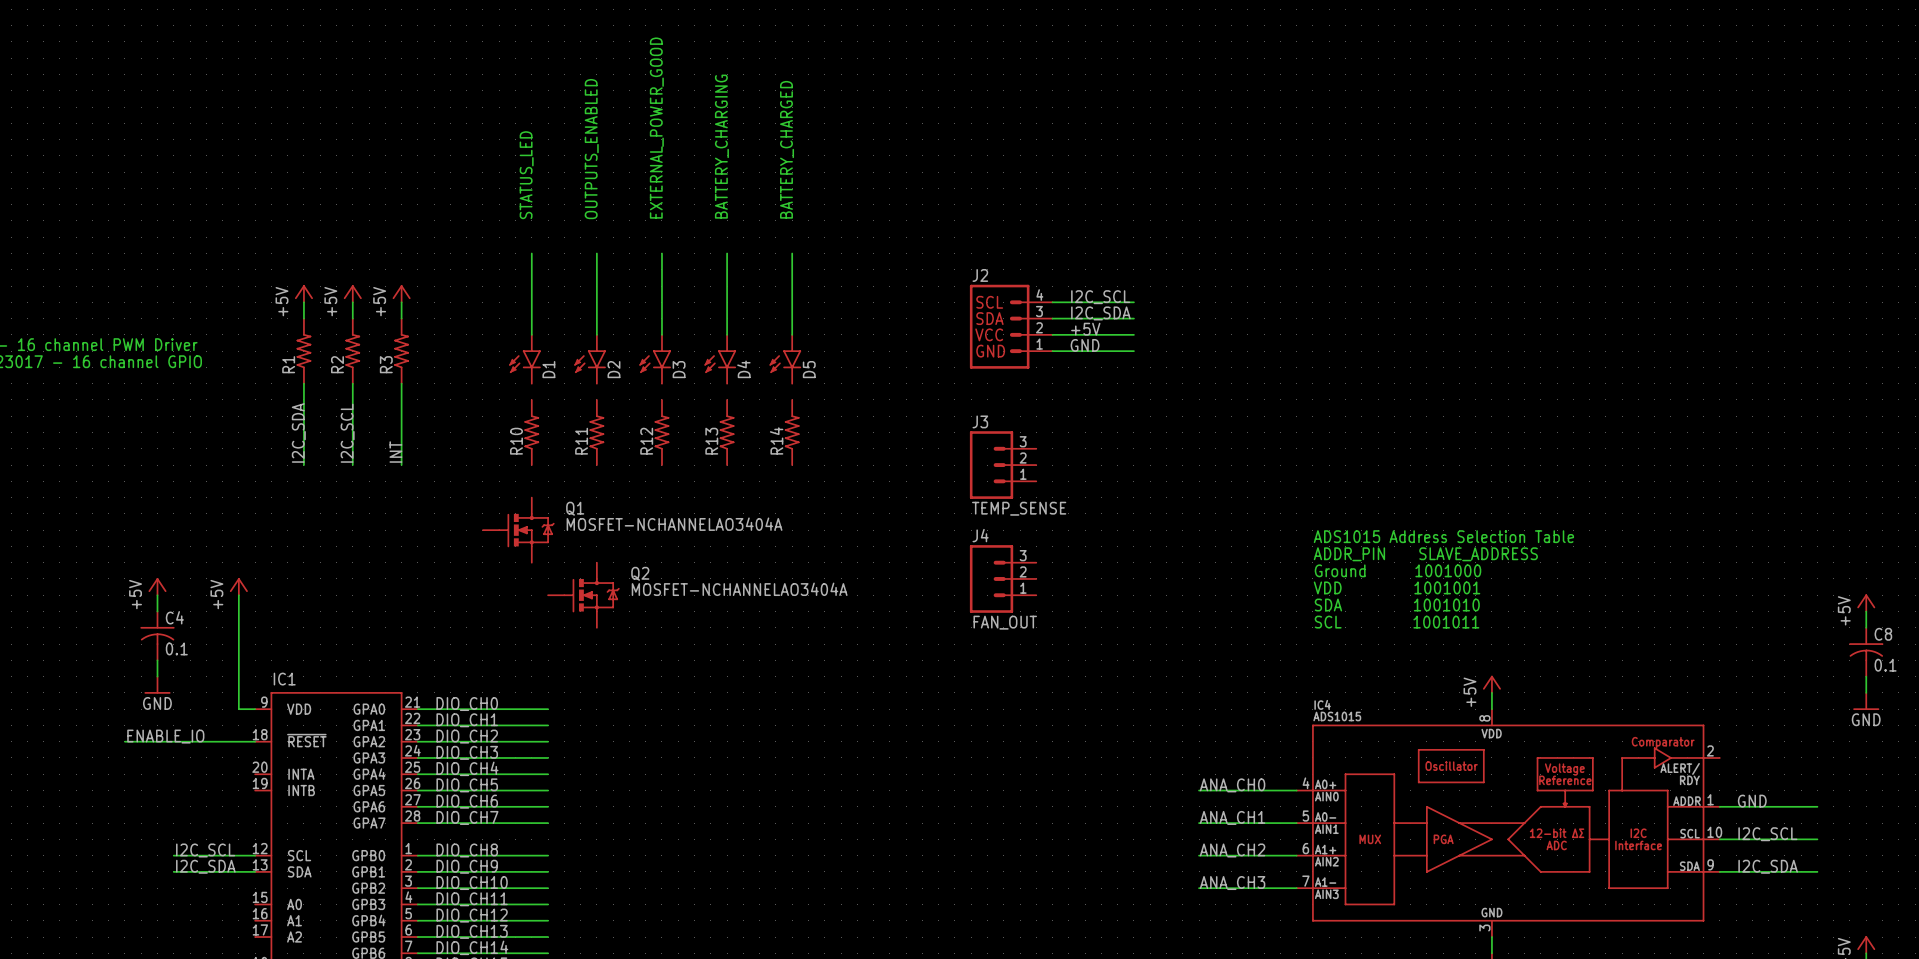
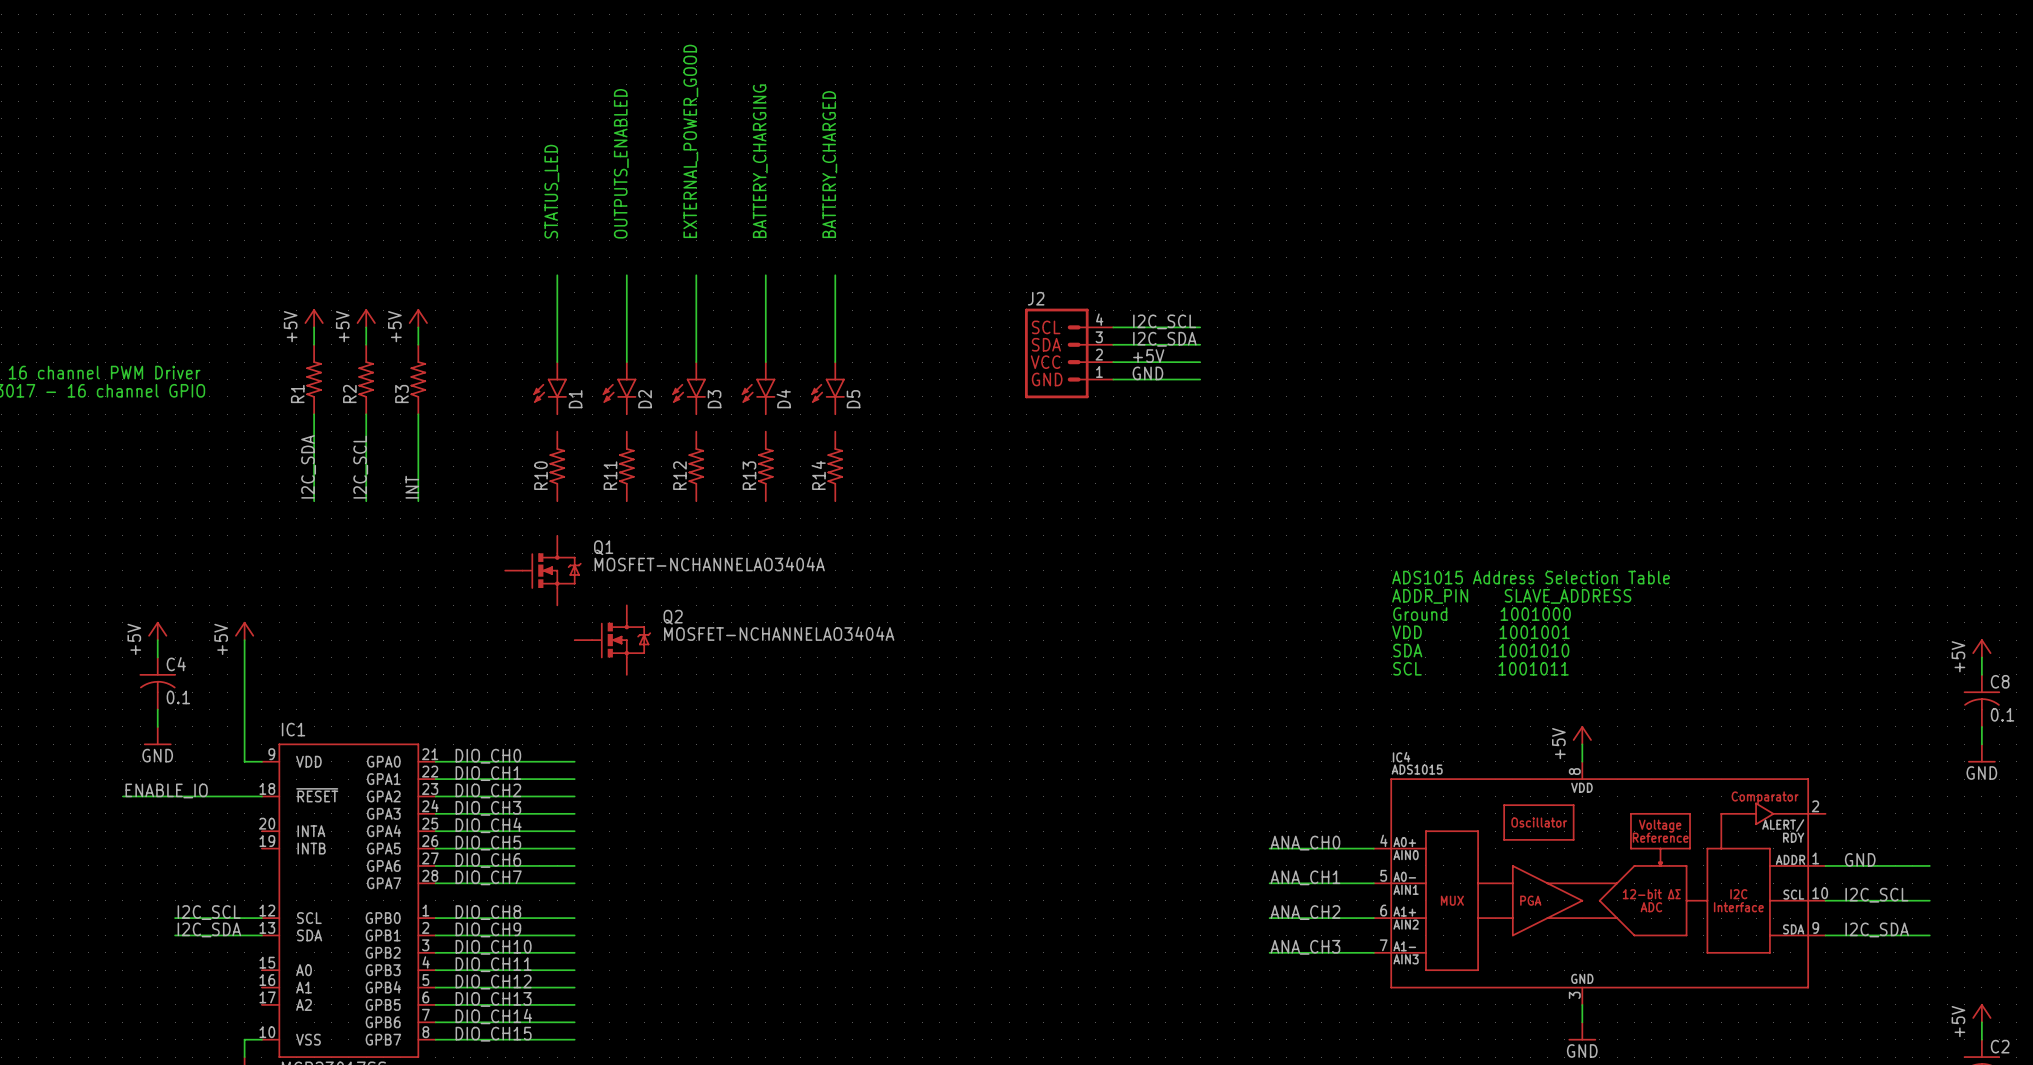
J3: TEMP_SENSE (1003, 465) -> none
J4: FAN_OUT (1003, 578) -> none

